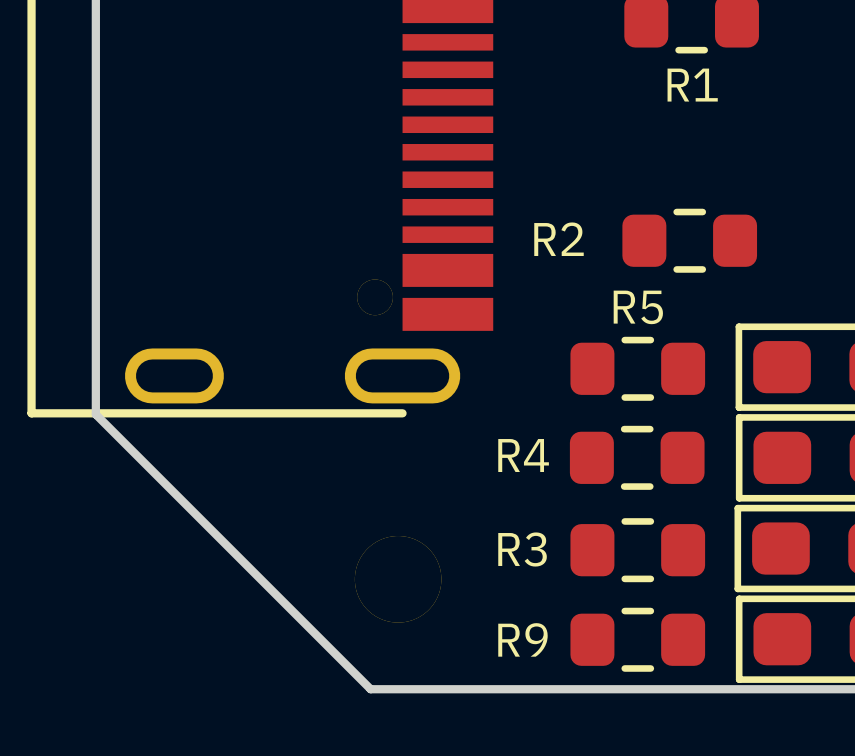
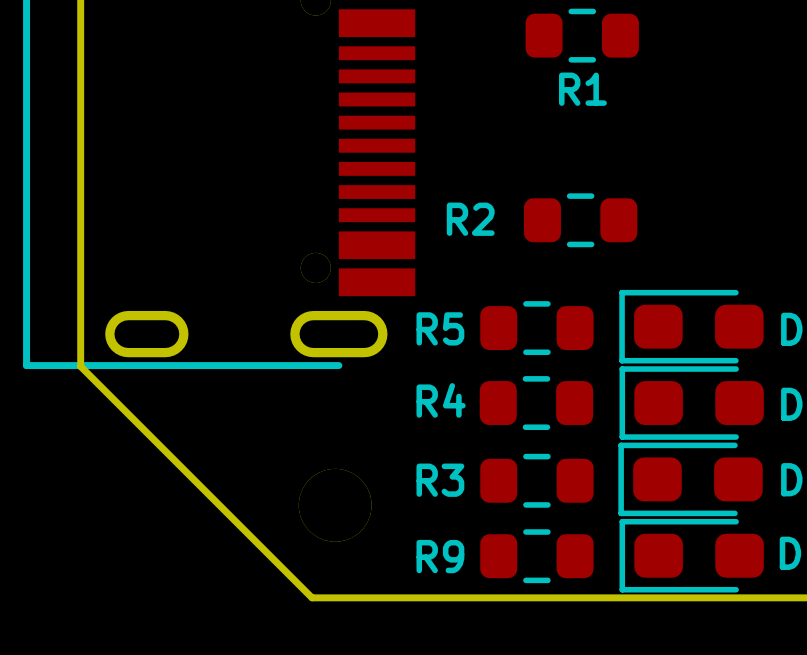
R5 name position: R5 (638, 307) -> R5 (440, 328)

